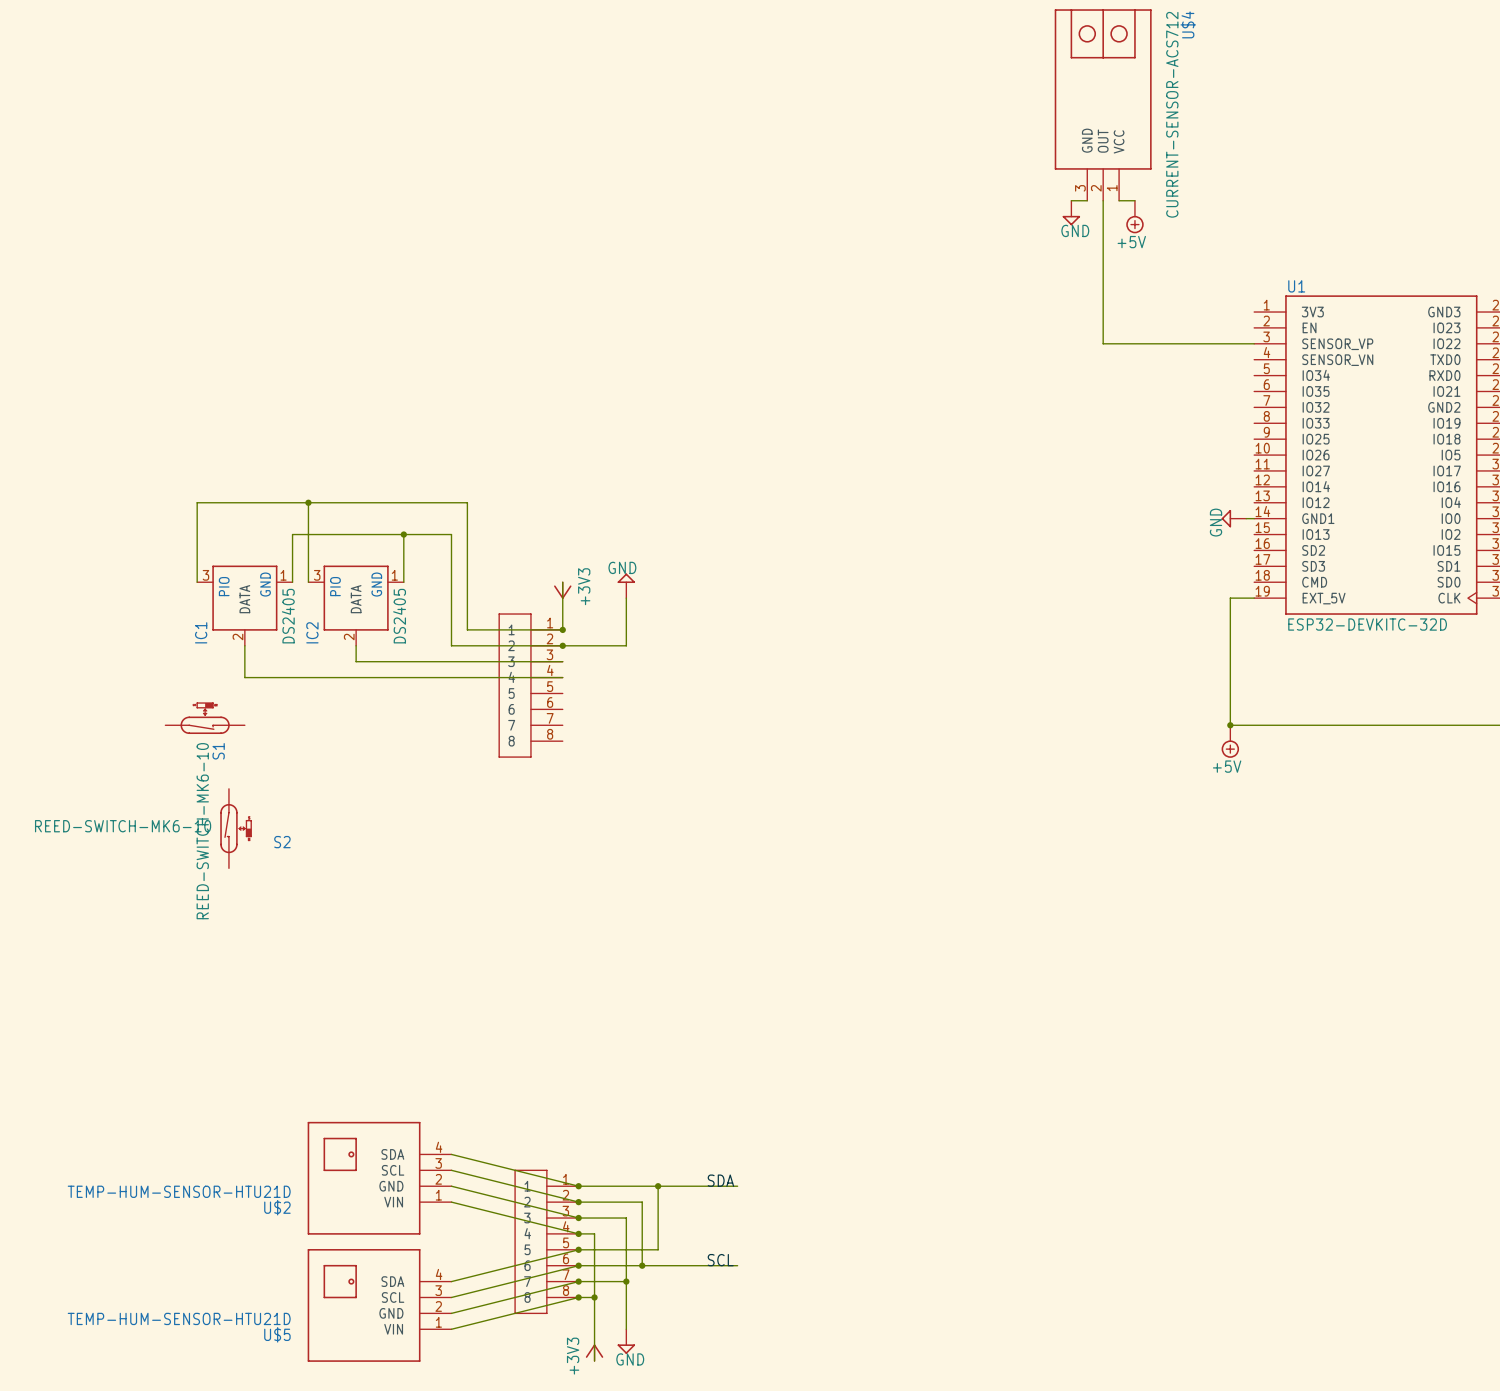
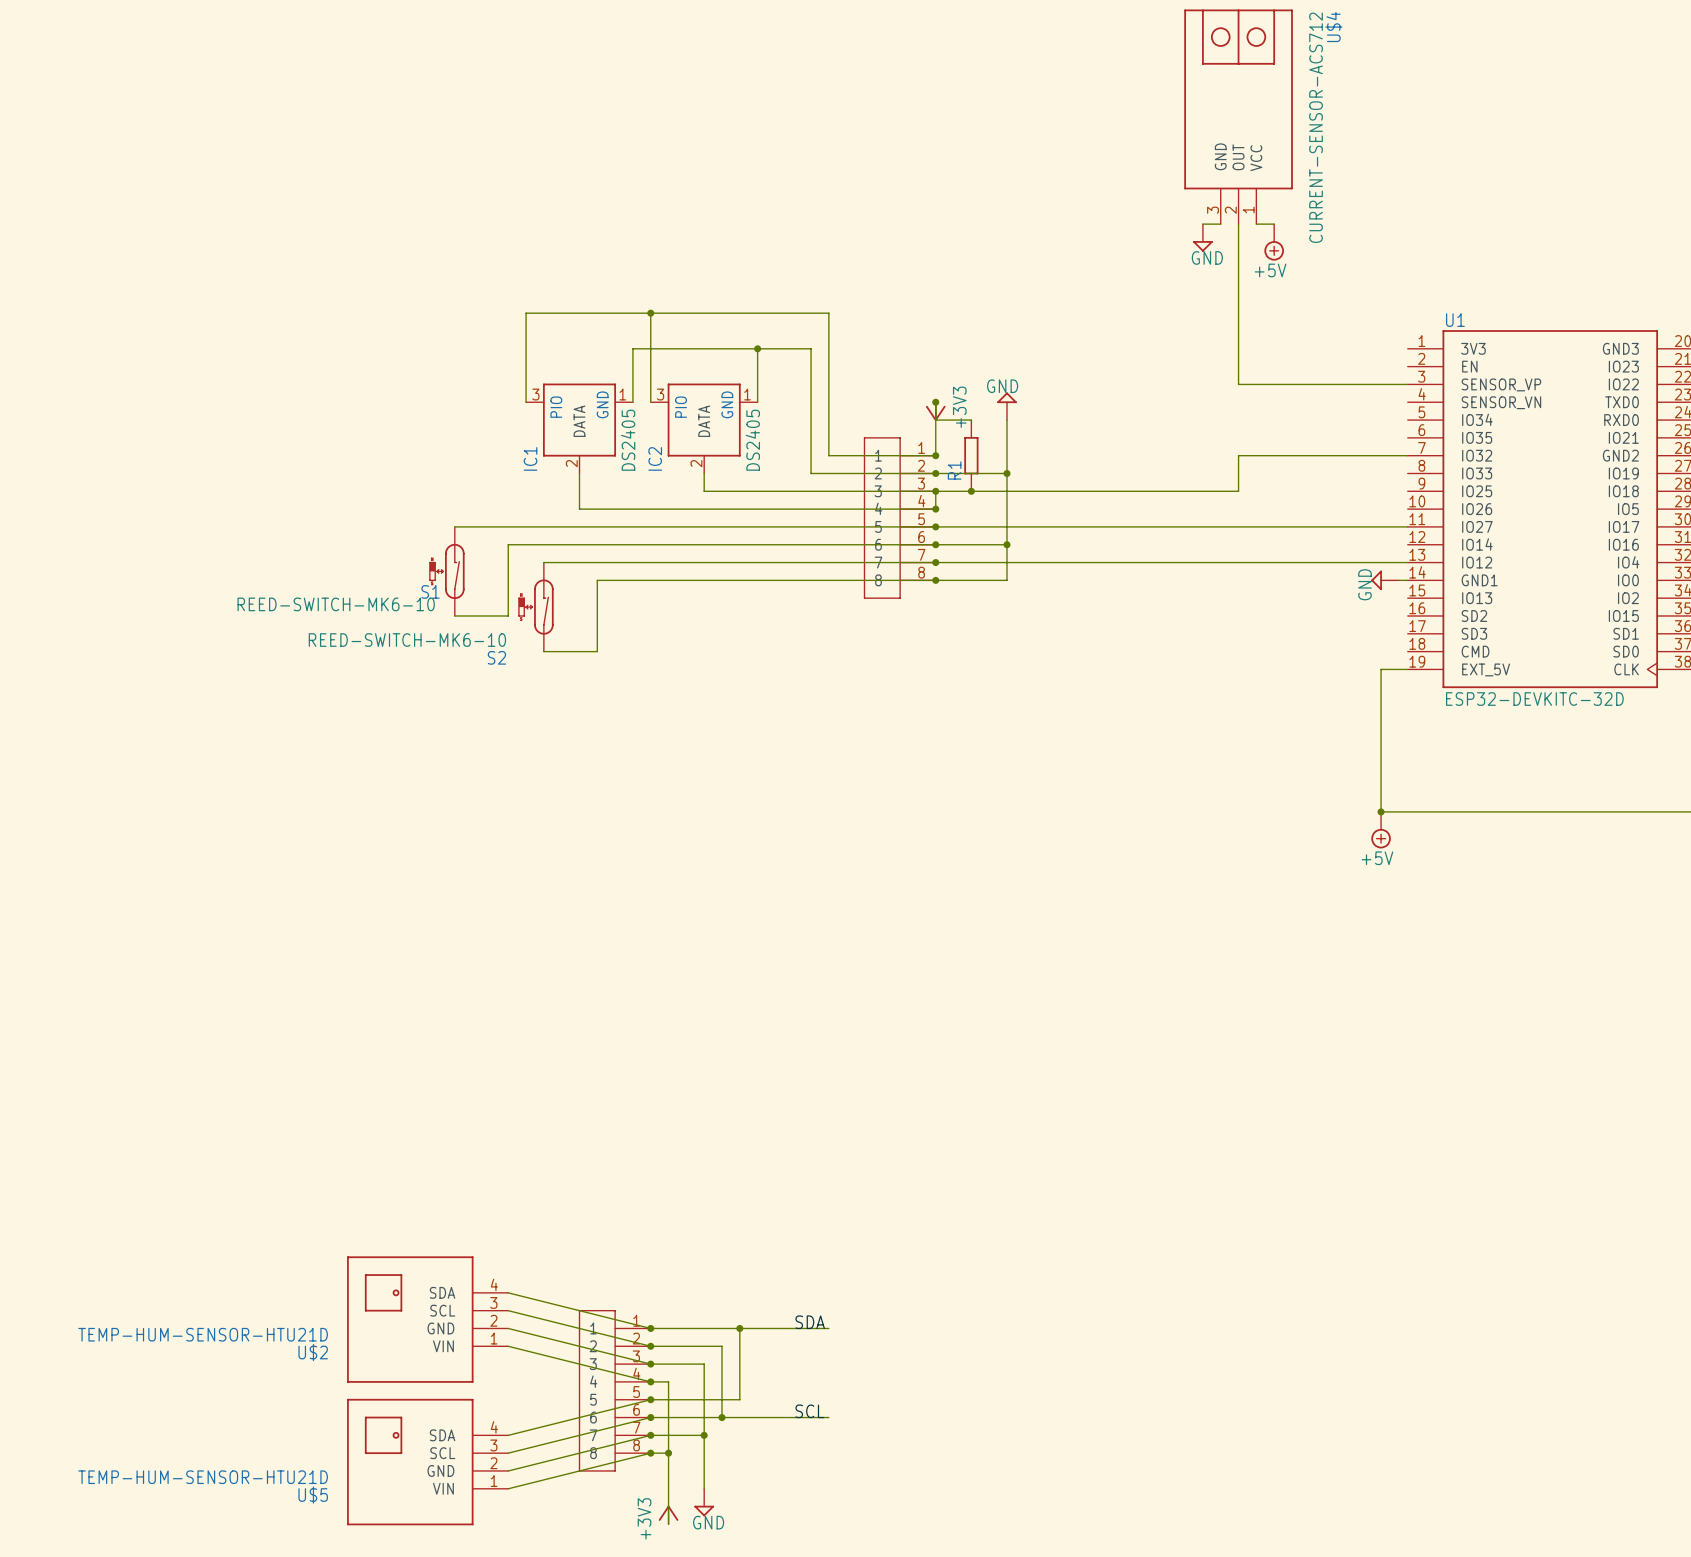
wire: none -> (650, 313) (650, 402)
junction: none -> (650, 313)
wire: none -> (757, 348) (757, 402)
junction: none -> (757, 348)
wire: none -> (526, 402) (526, 313) (828, 313) (828, 455) (935, 455) (935, 402)
wire: none -> (632, 402) (632, 348) (811, 348) (811, 473) (1006, 473)
junction: none -> (935, 402)
power symbol: none -> GND (1006, 406)
power symbol: none -> +3V3 (935, 411)
wire: none -> (935, 420) (971, 420)
wire: none -> (1006, 420) (1006, 580) (597, 580) (597, 651) (543, 651)
junction: none -> (935, 455)
R1: none -> (971, 455)
wire: none -> (1407, 455) (1238, 455) (1238, 491) (704, 491) (704, 473)
wire: none -> (579, 473) (579, 509) (935, 509) (935, 491)
junction: none -> (935, 473)
junction: none -> (1006, 473)
junction: none -> (935, 491)
junction: none -> (971, 491)
junction: none -> (935, 509)
part: none -> (899, 518)
wire: none -> (454, 526) (1407, 526)
junction: none -> (935, 526)
junction: none -> (935, 544)
junction: none -> (1006, 544)
wire: (308, 502) (308, 582) -> none
junction: (308, 502) -> none
wire: none -> (543, 562) (1407, 562)
junction: none -> (935, 562)
junction: none -> (935, 580)
wire: (403, 534) (403, 582) -> none
junction: (403, 534) -> none
wire: (451, 534) (292, 534) (292, 582) -> (508, 598) (508, 544) (1006, 544)
wire: (451, 550) (451, 645) (626, 645) (626, 598) -> (508, 615) (454, 615)
wire: (197, 582) (197, 502) (467, 502) (467, 629) (562, 629) (562, 582) -> none
power symbol: GND (626, 585) -> none
power symbol: +3V3 (562, 590) -> none
IC1 position: (244, 605) -> (579, 428)
IC2 position: (356, 605) -> (704, 428)
junction: (562, 629) -> none
wire: (244, 645) (244, 677) (562, 677) -> none
wire: (356, 645) (356, 661) (562, 661) -> none
junction: (562, 645) -> none
part: (530, 685) -> none
S1 symbol: [165, 702, 245, 735] -> [429, 526, 465, 616]
S1 name position: S1 (218, 751) -> S1 (430, 591)
S2 symbol: [220, 788, 252, 869] -> [518, 562, 554, 652]
S2 value position: REED-SWITCH-MK6-10 (123, 826) -> REED-SWITCH-MK6-10 (407, 640)
S1 value position: REED-SWITCH-MK6-10 (202, 831) -> REED-SWITCH-MK6-10 (336, 604)
S2 name position: S2 (282, 842) -> S2 (496, 657)

